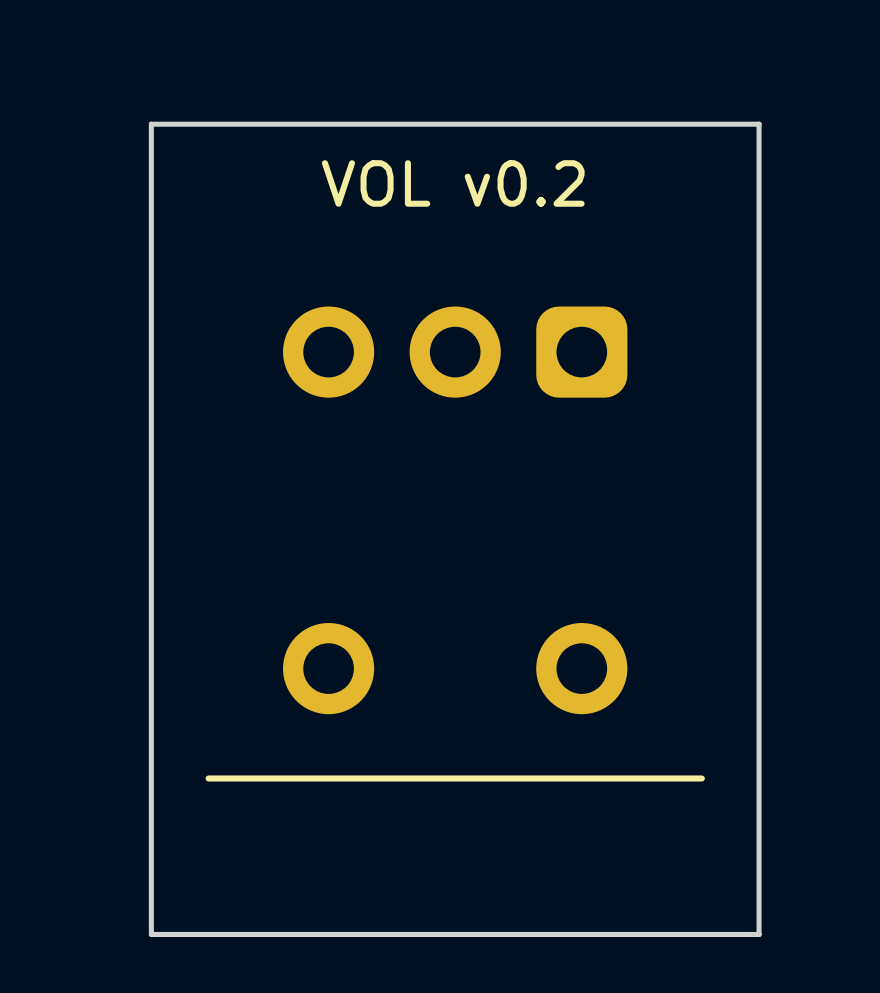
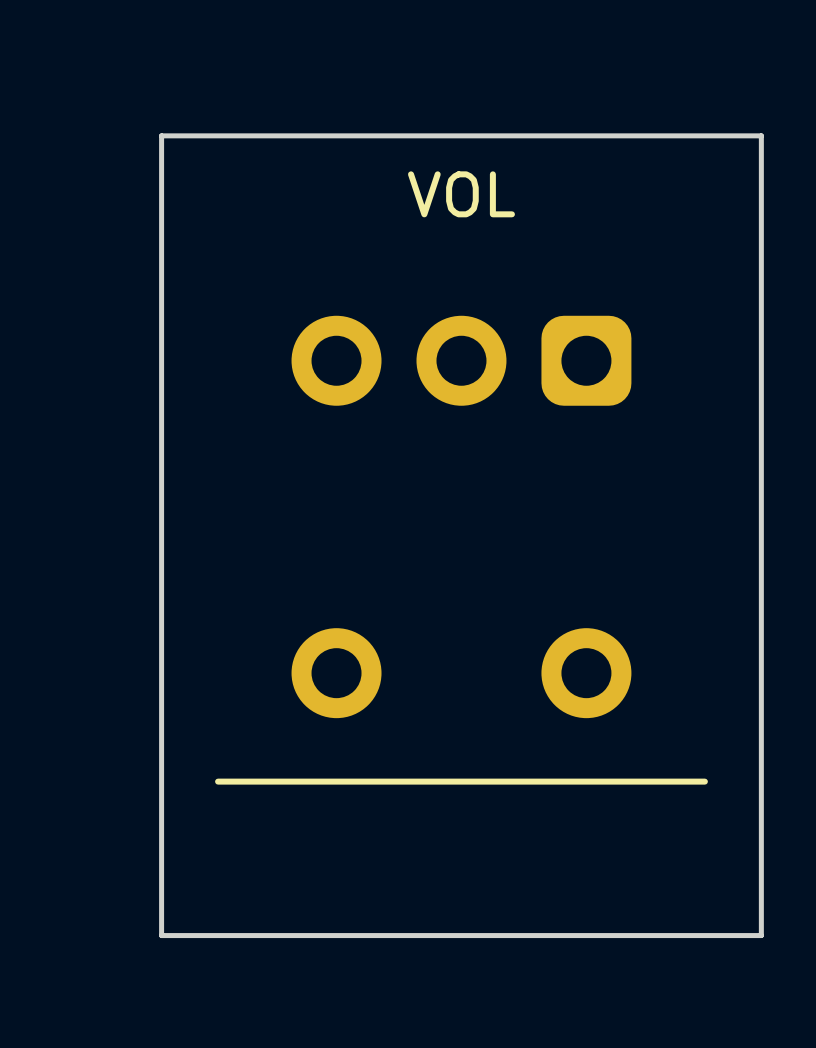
text: VOL v0.2 (453, 183) -> VOL (461, 194)

